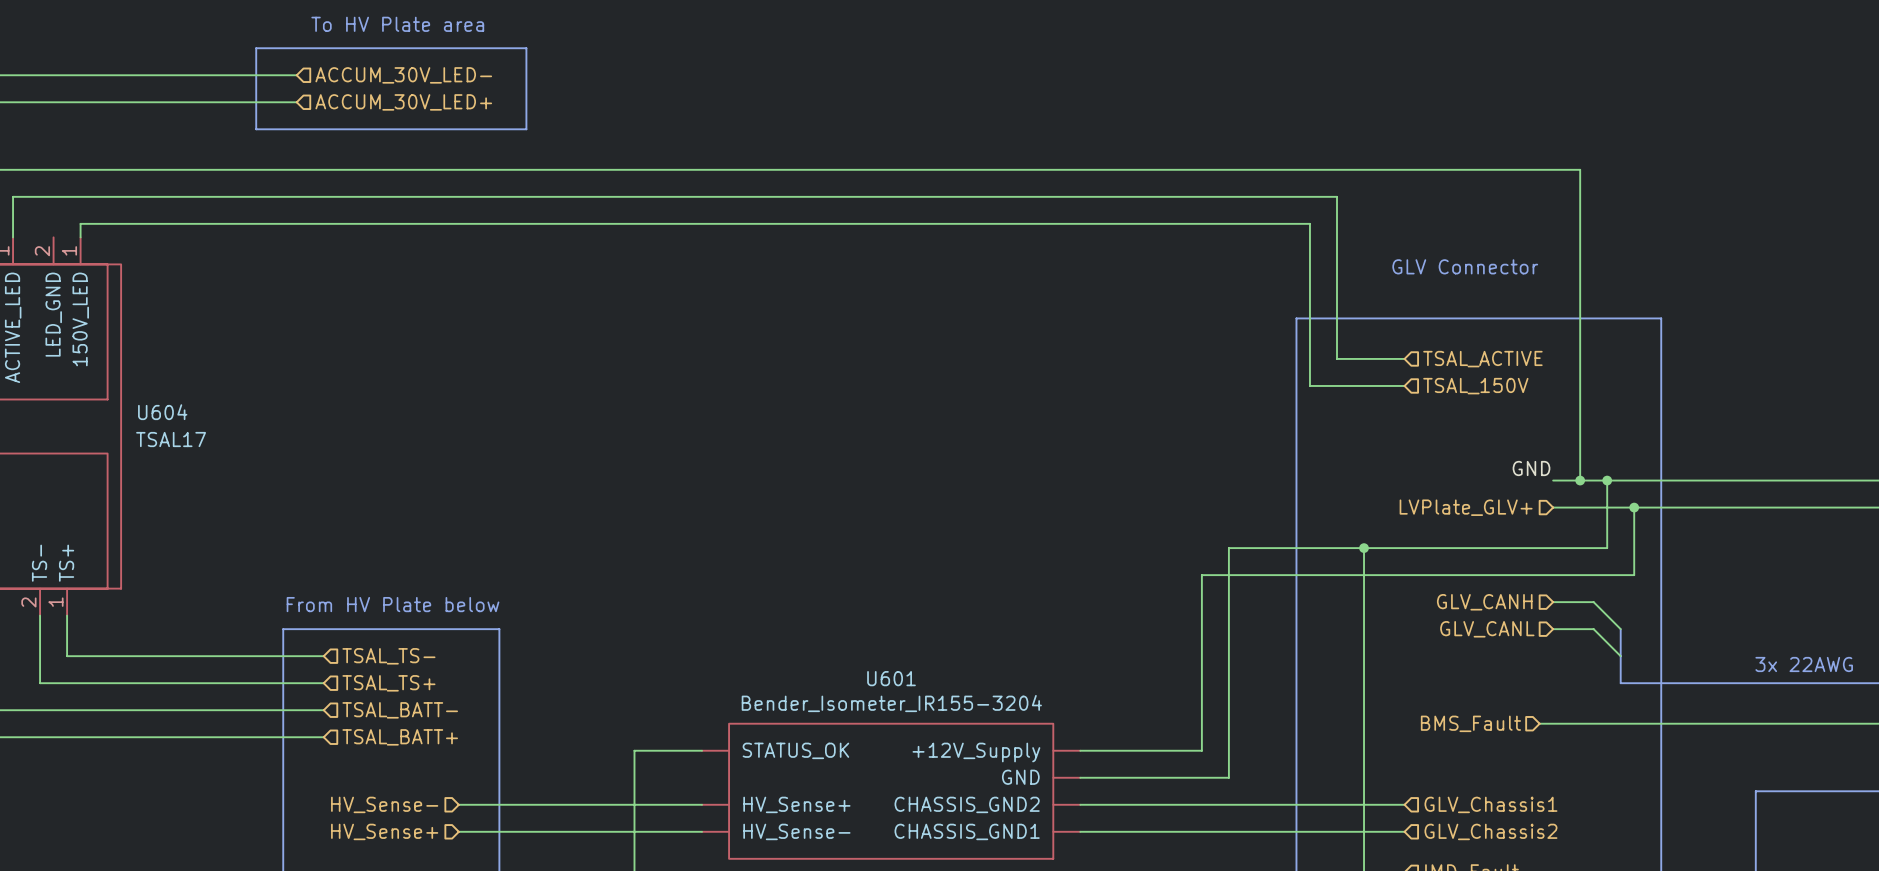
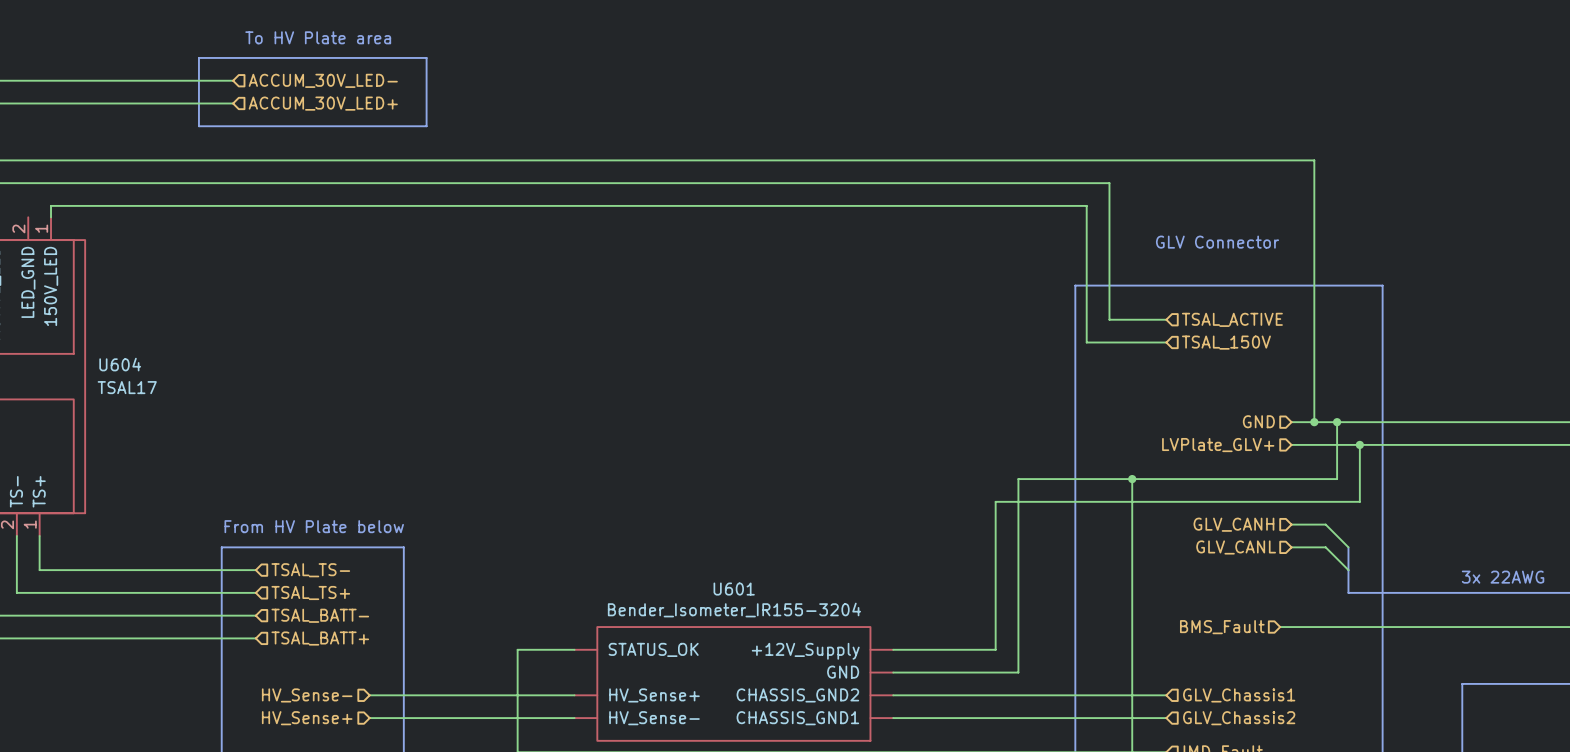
label: GND (1531, 468) -> none
hierarchical label: none -> GND (1258, 421)

